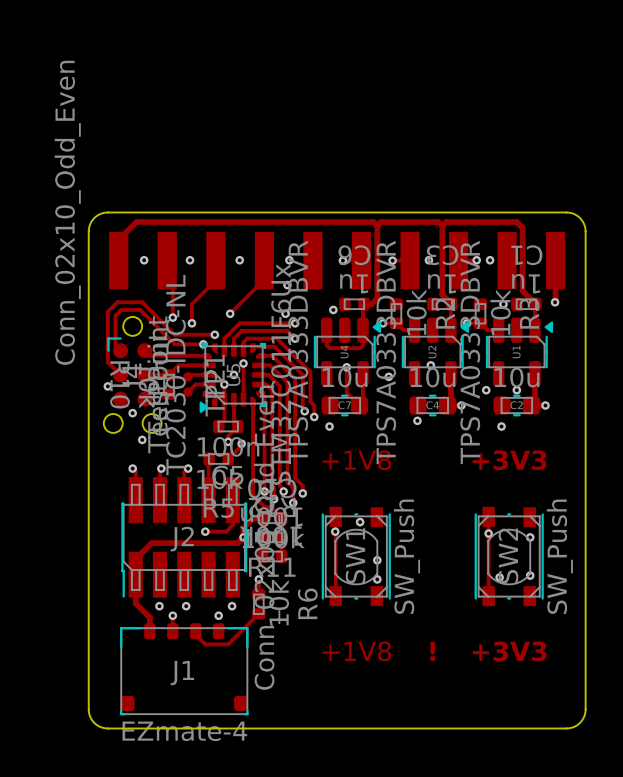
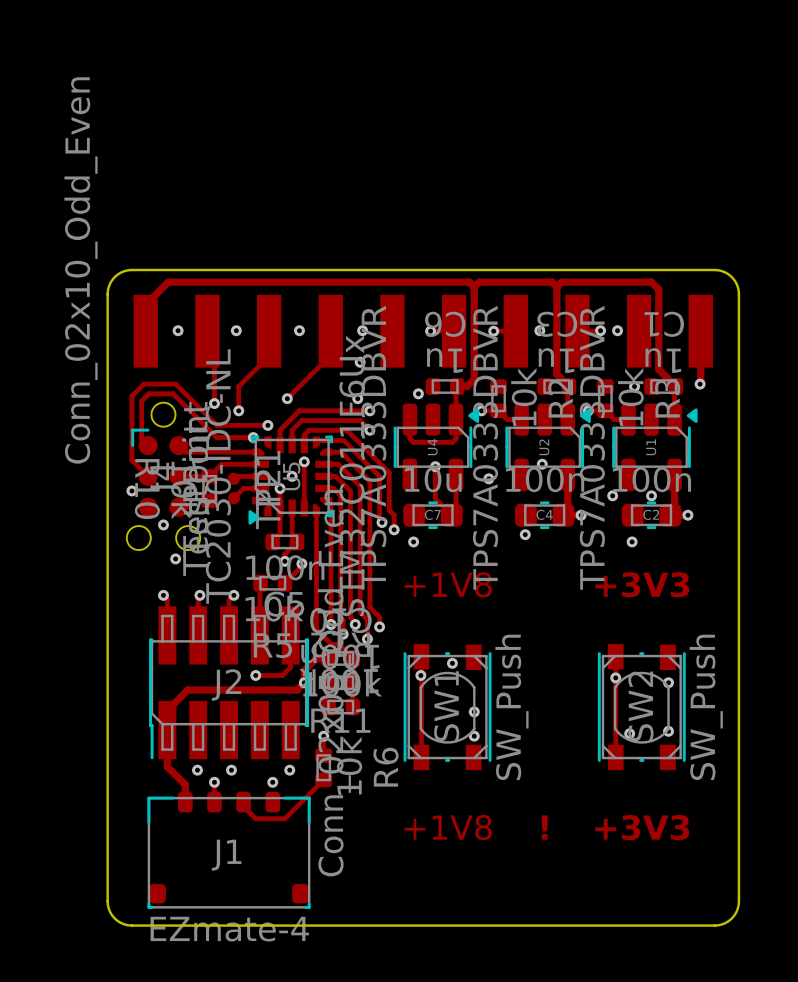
C4 value: 10u (432, 377) -> 100n (545, 479)
C2 value: 10u (517, 377) -> 100n (651, 479)

